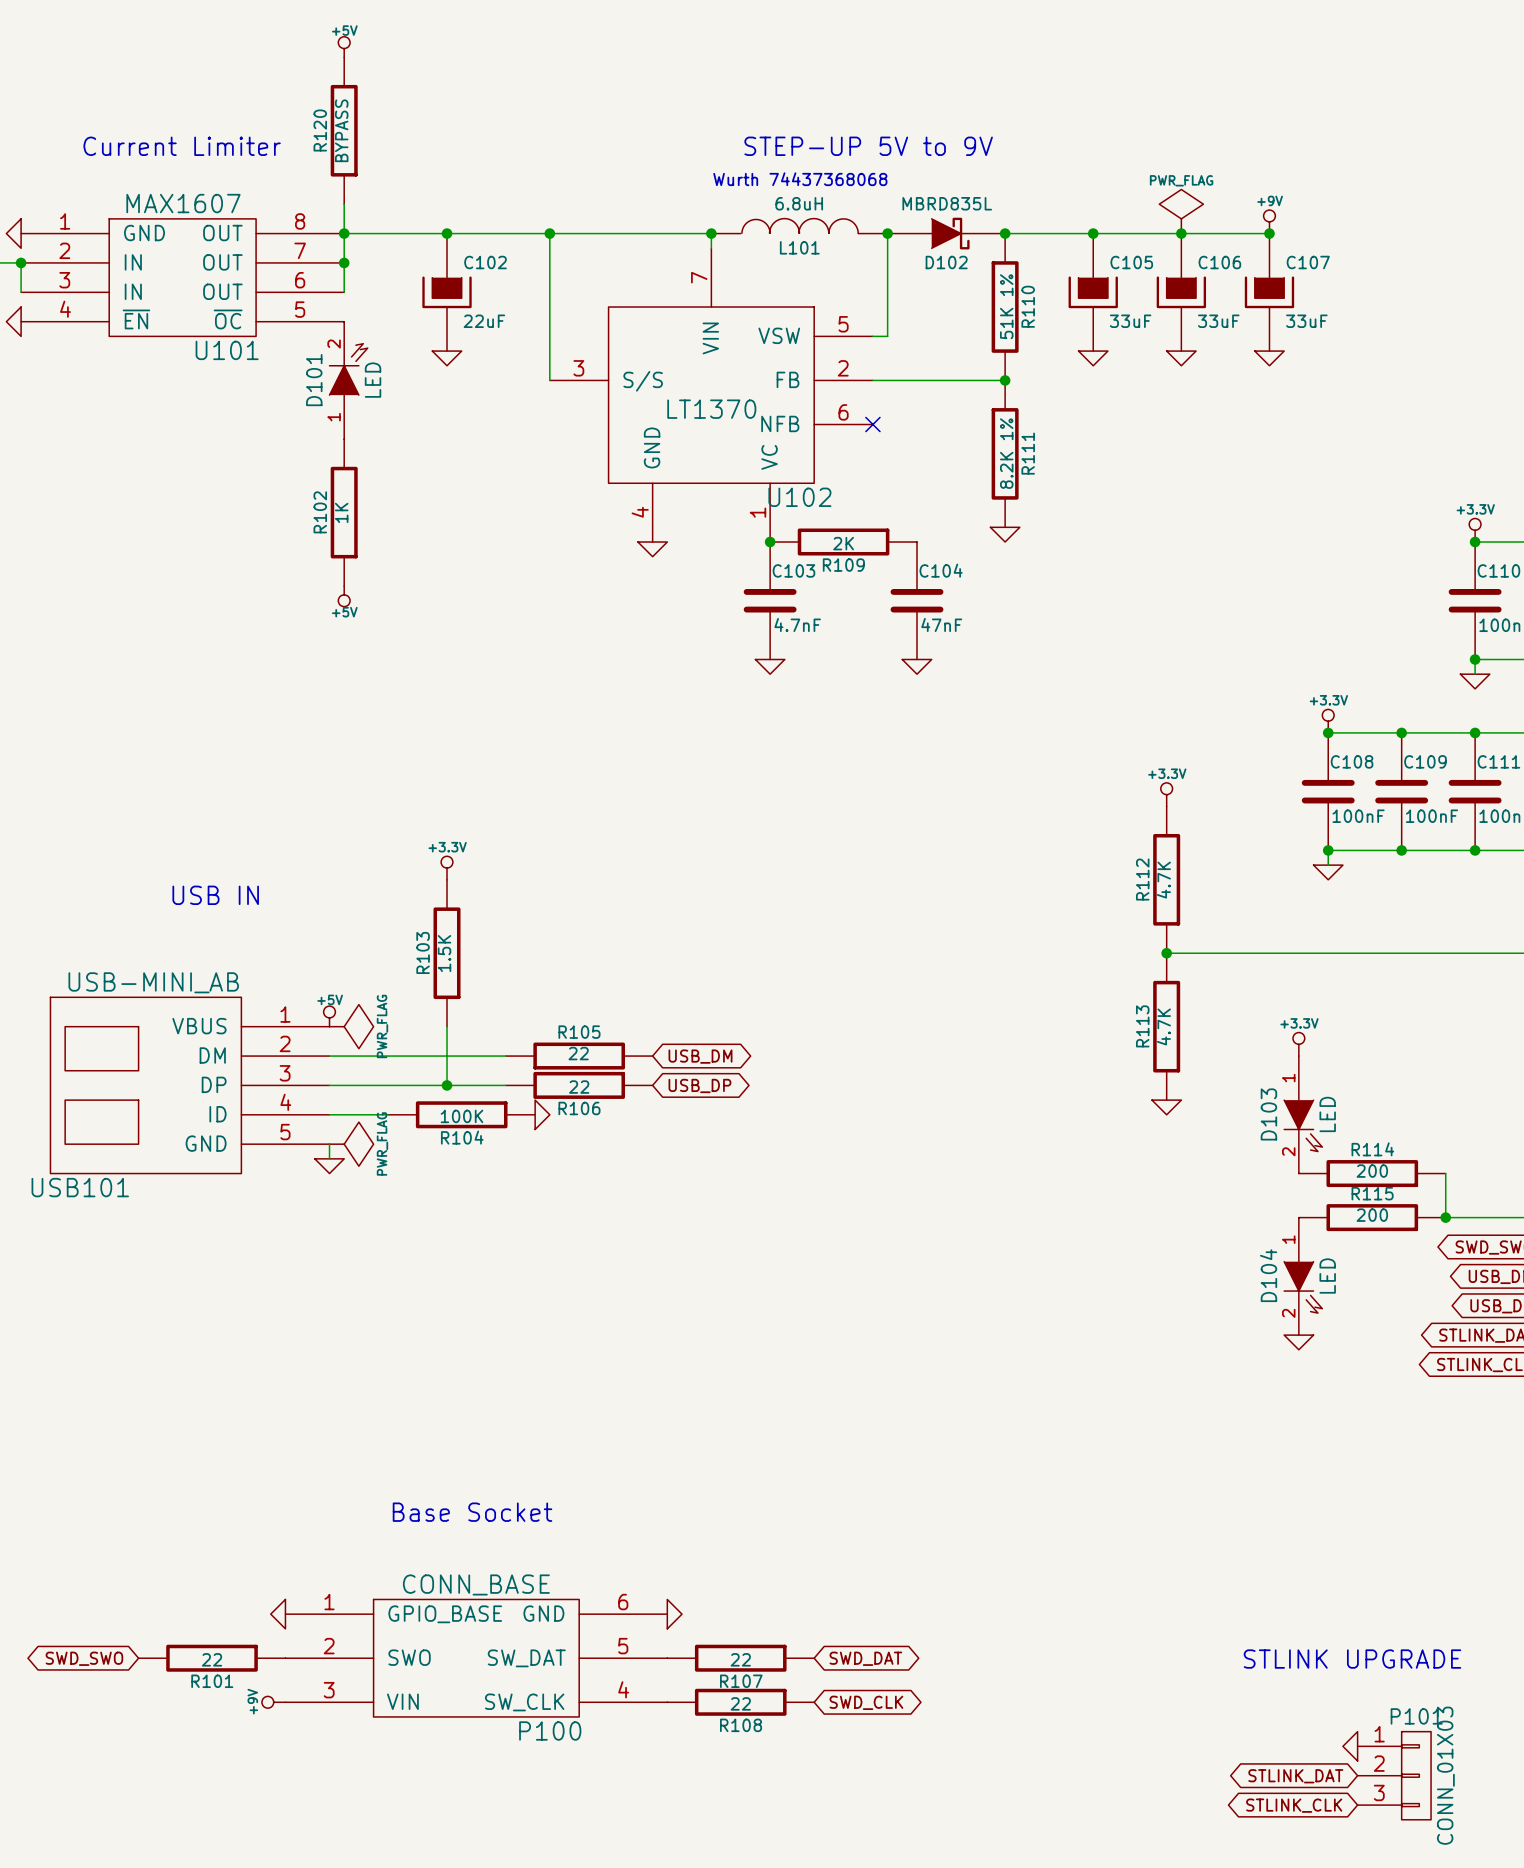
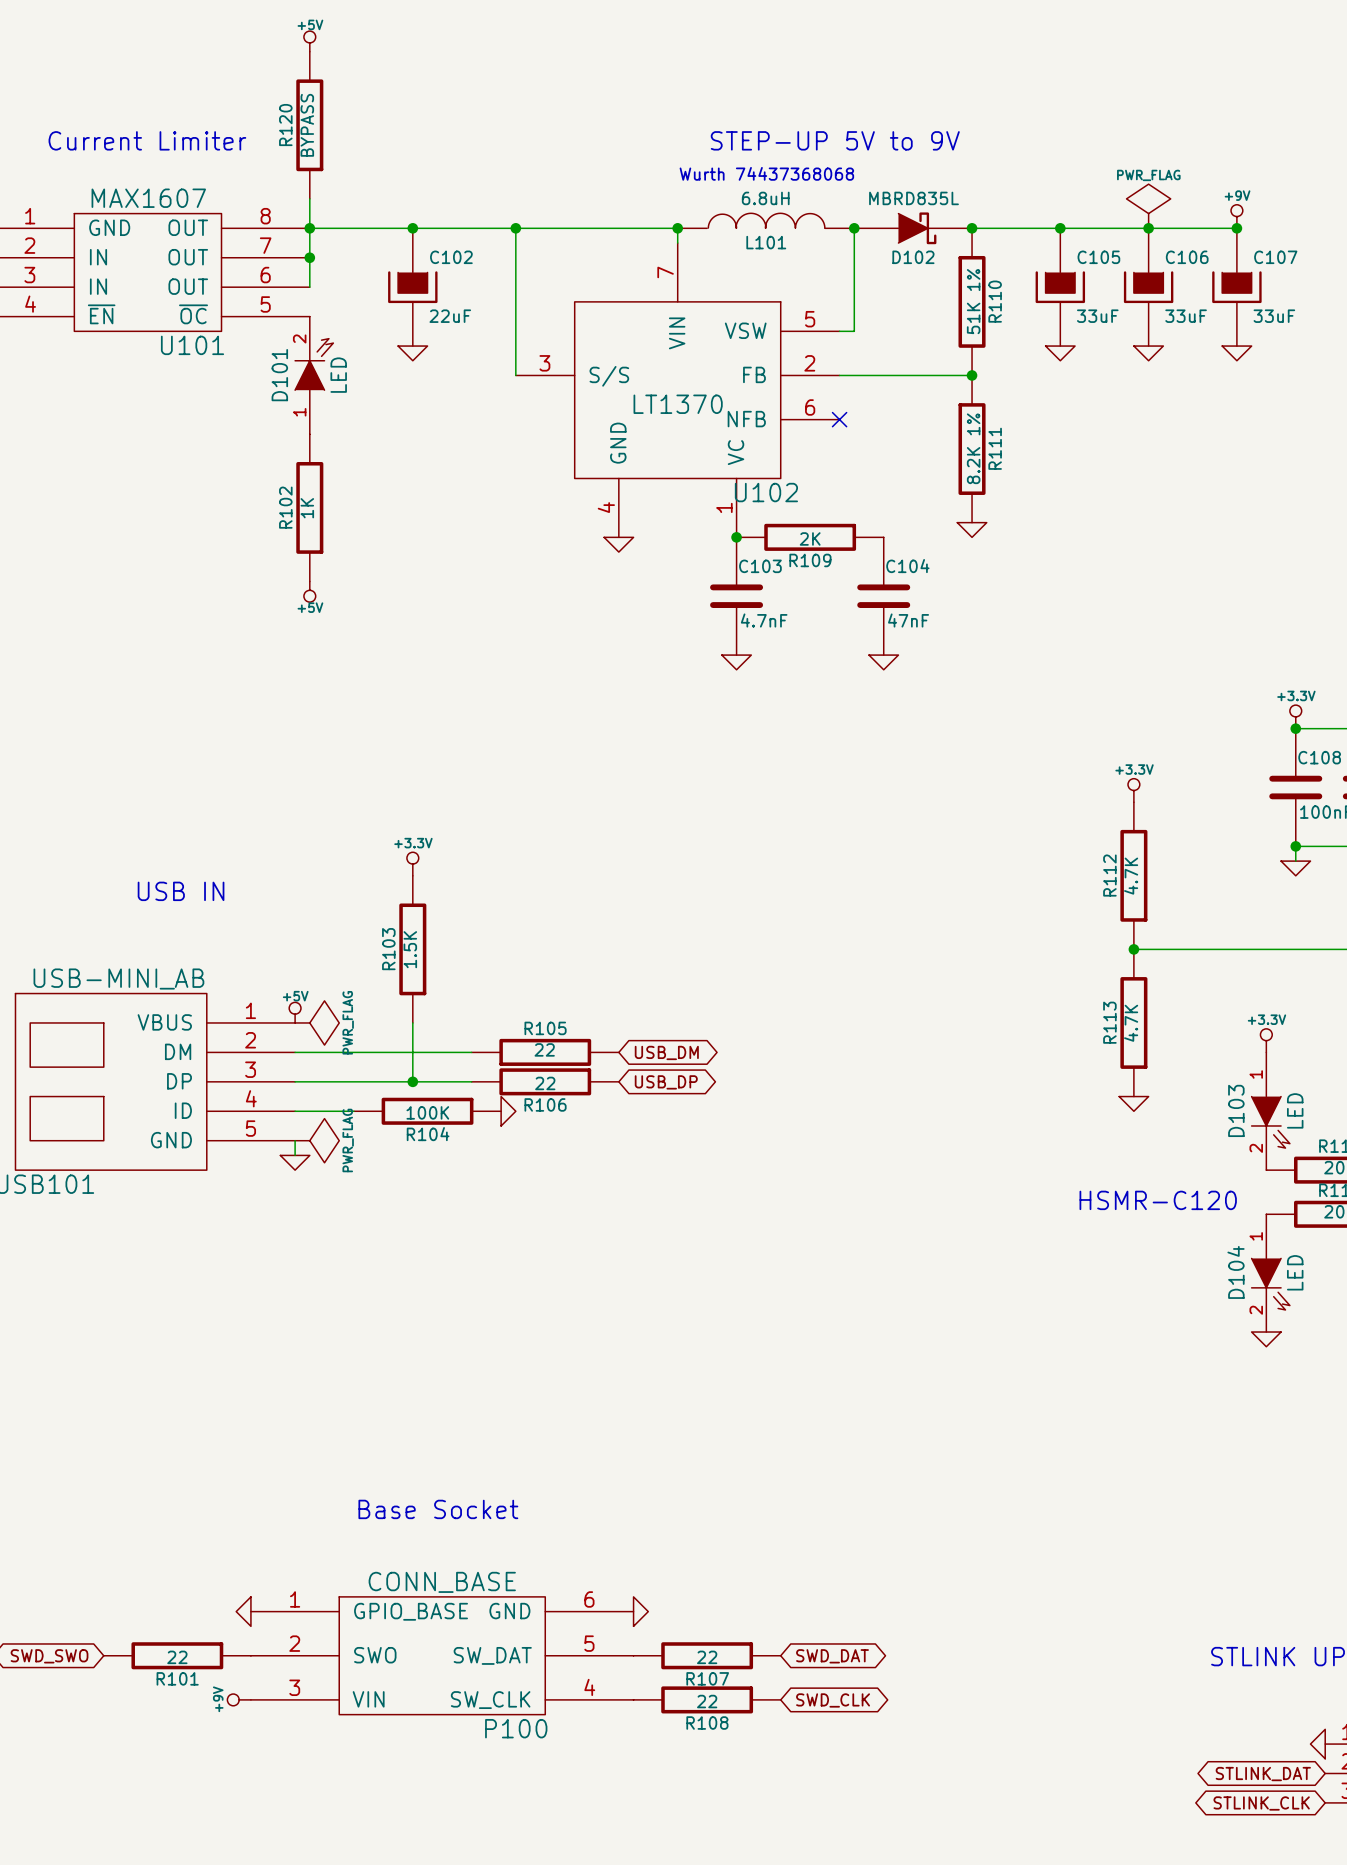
text: none -> HSMR-C120 (1158, 1200)

